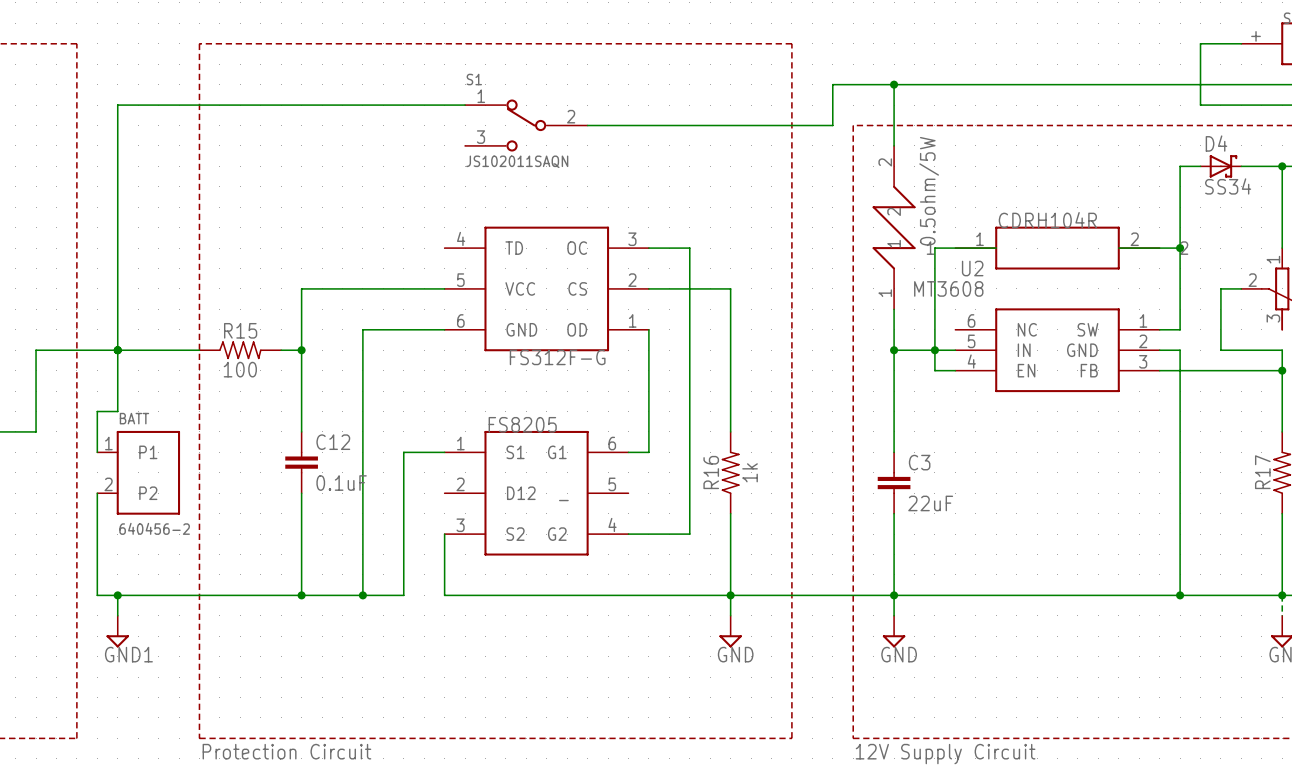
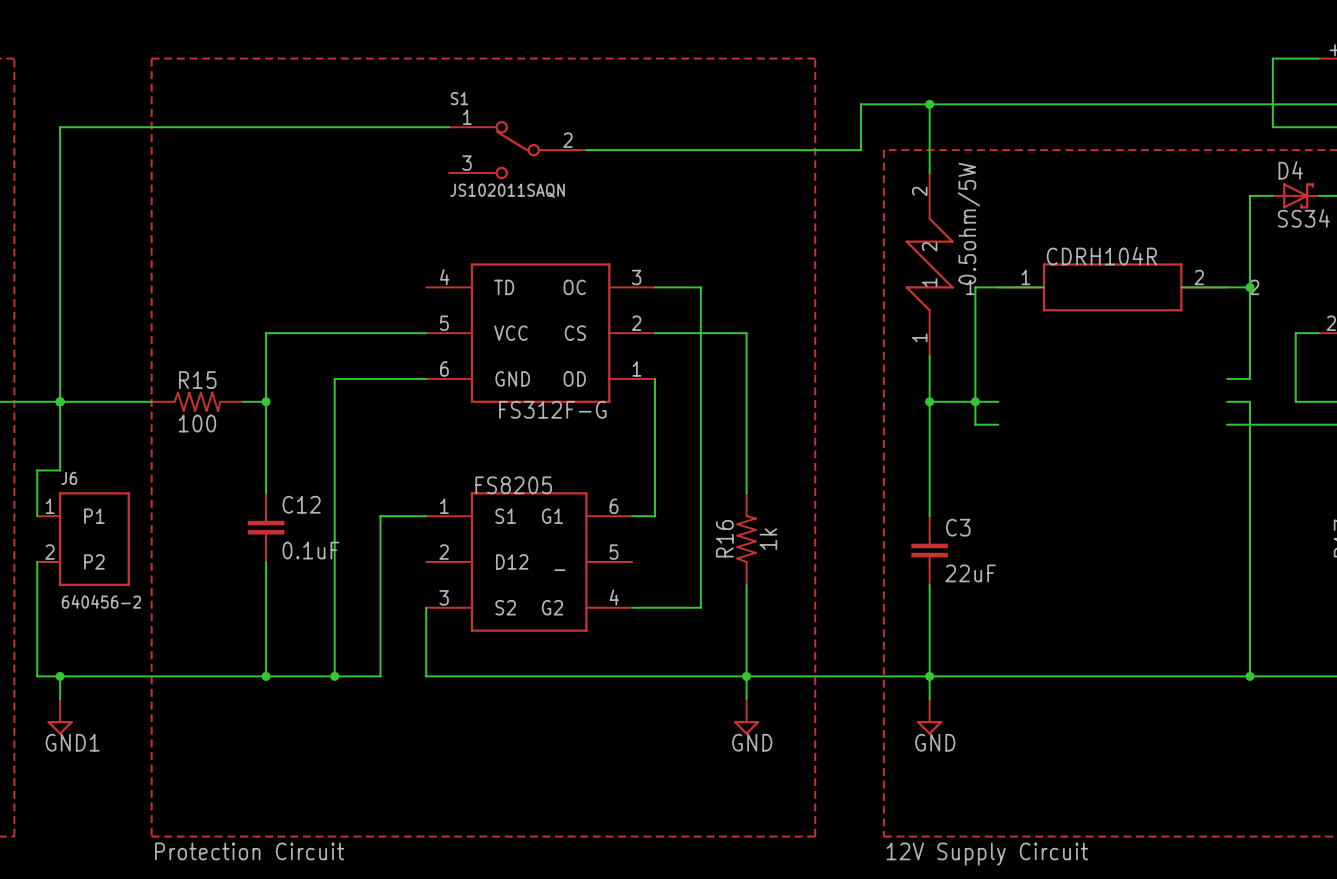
U2: MT3608 (1057, 350) -> none
BATT name: BATT (134, 418) -> J6 (69, 478)

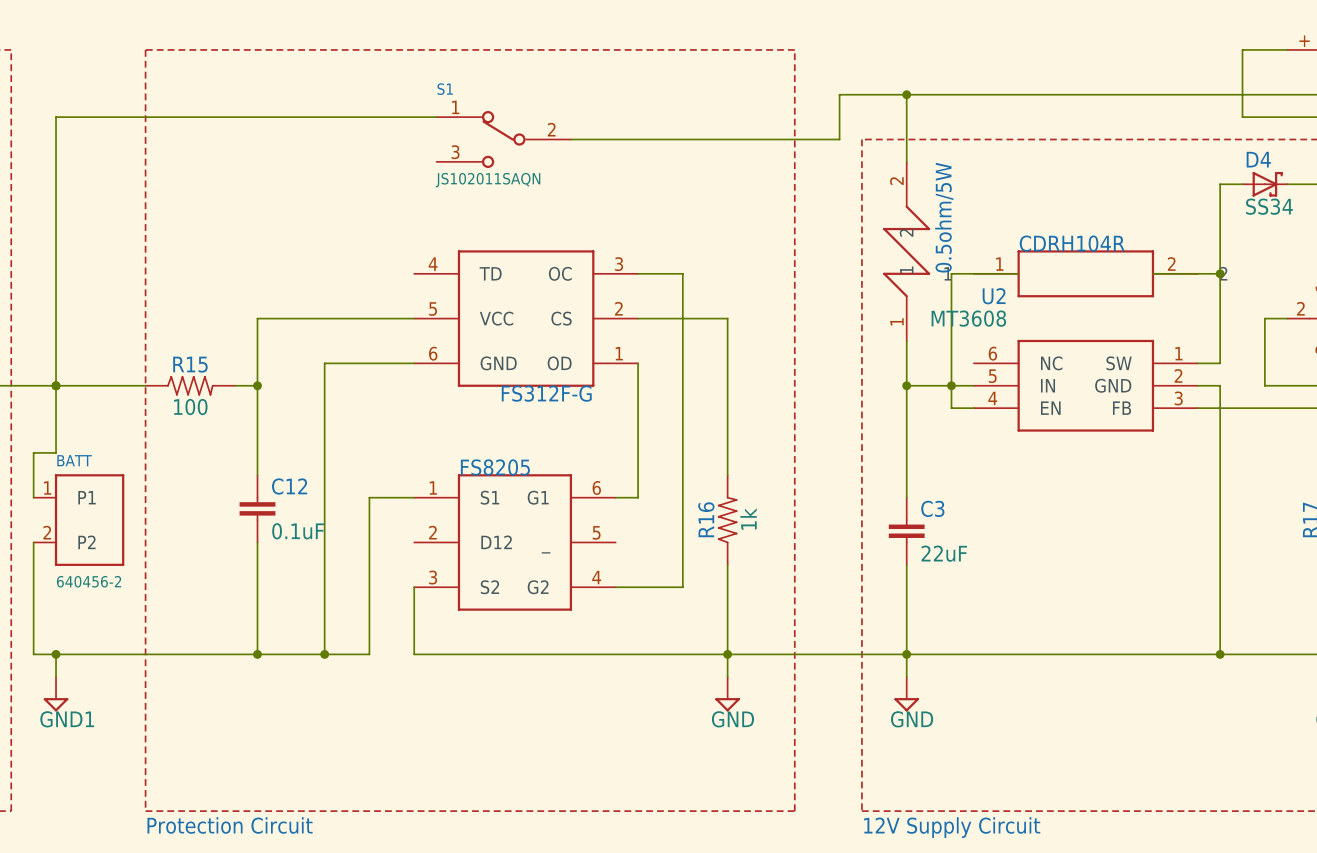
U2: none -> MT3608 (1085, 385)
J6 name: J6 (69, 478) -> BATT (74, 460)

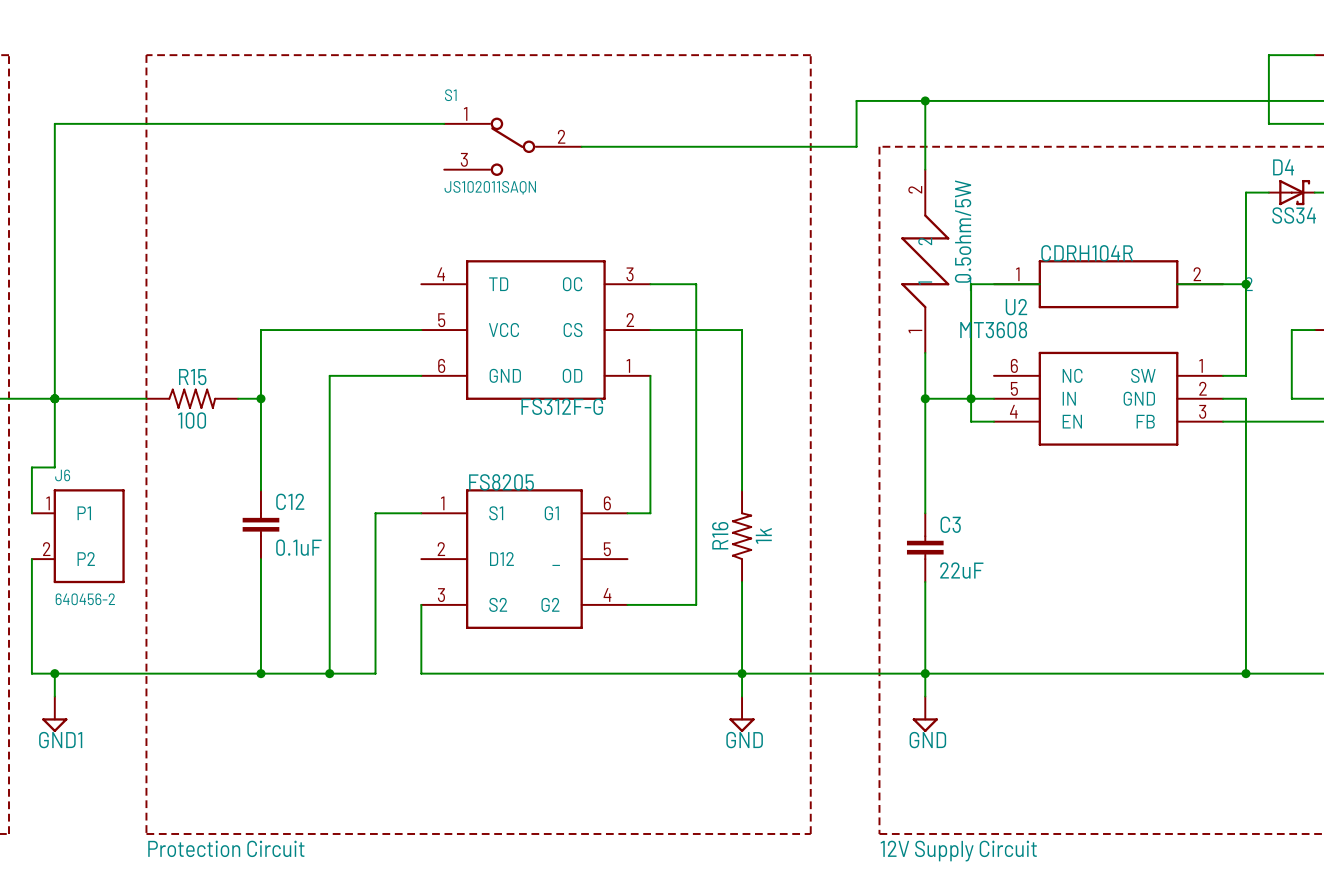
BATT name: BATT (74, 460) -> J6 (62, 475)

